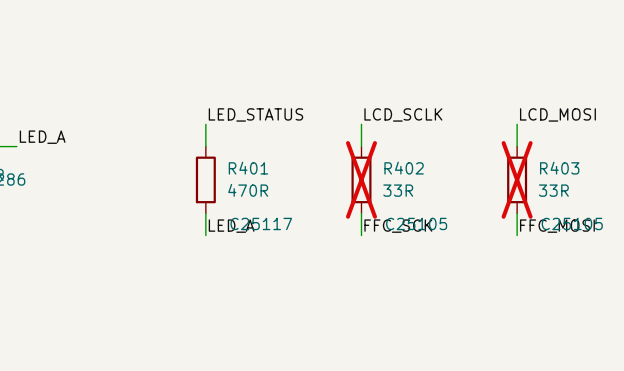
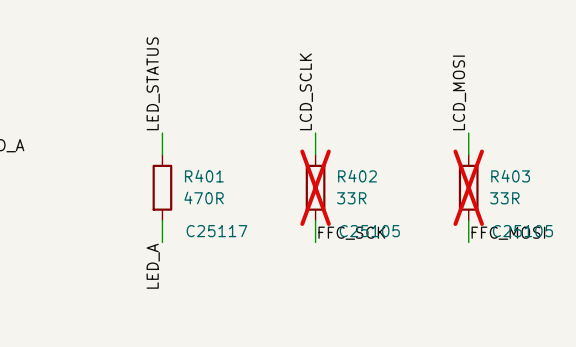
label rotation: 0° (255, 114) -> 90° counterclockwise (153, 83)
label rotation: 0° (403, 114) -> 90° counterclockwise (306, 91)
label rotation: 0° (557, 114) -> 90° counterclockwise (459, 92)
label rotation: 0° (231, 226) -> 90° counterclockwise (153, 266)

